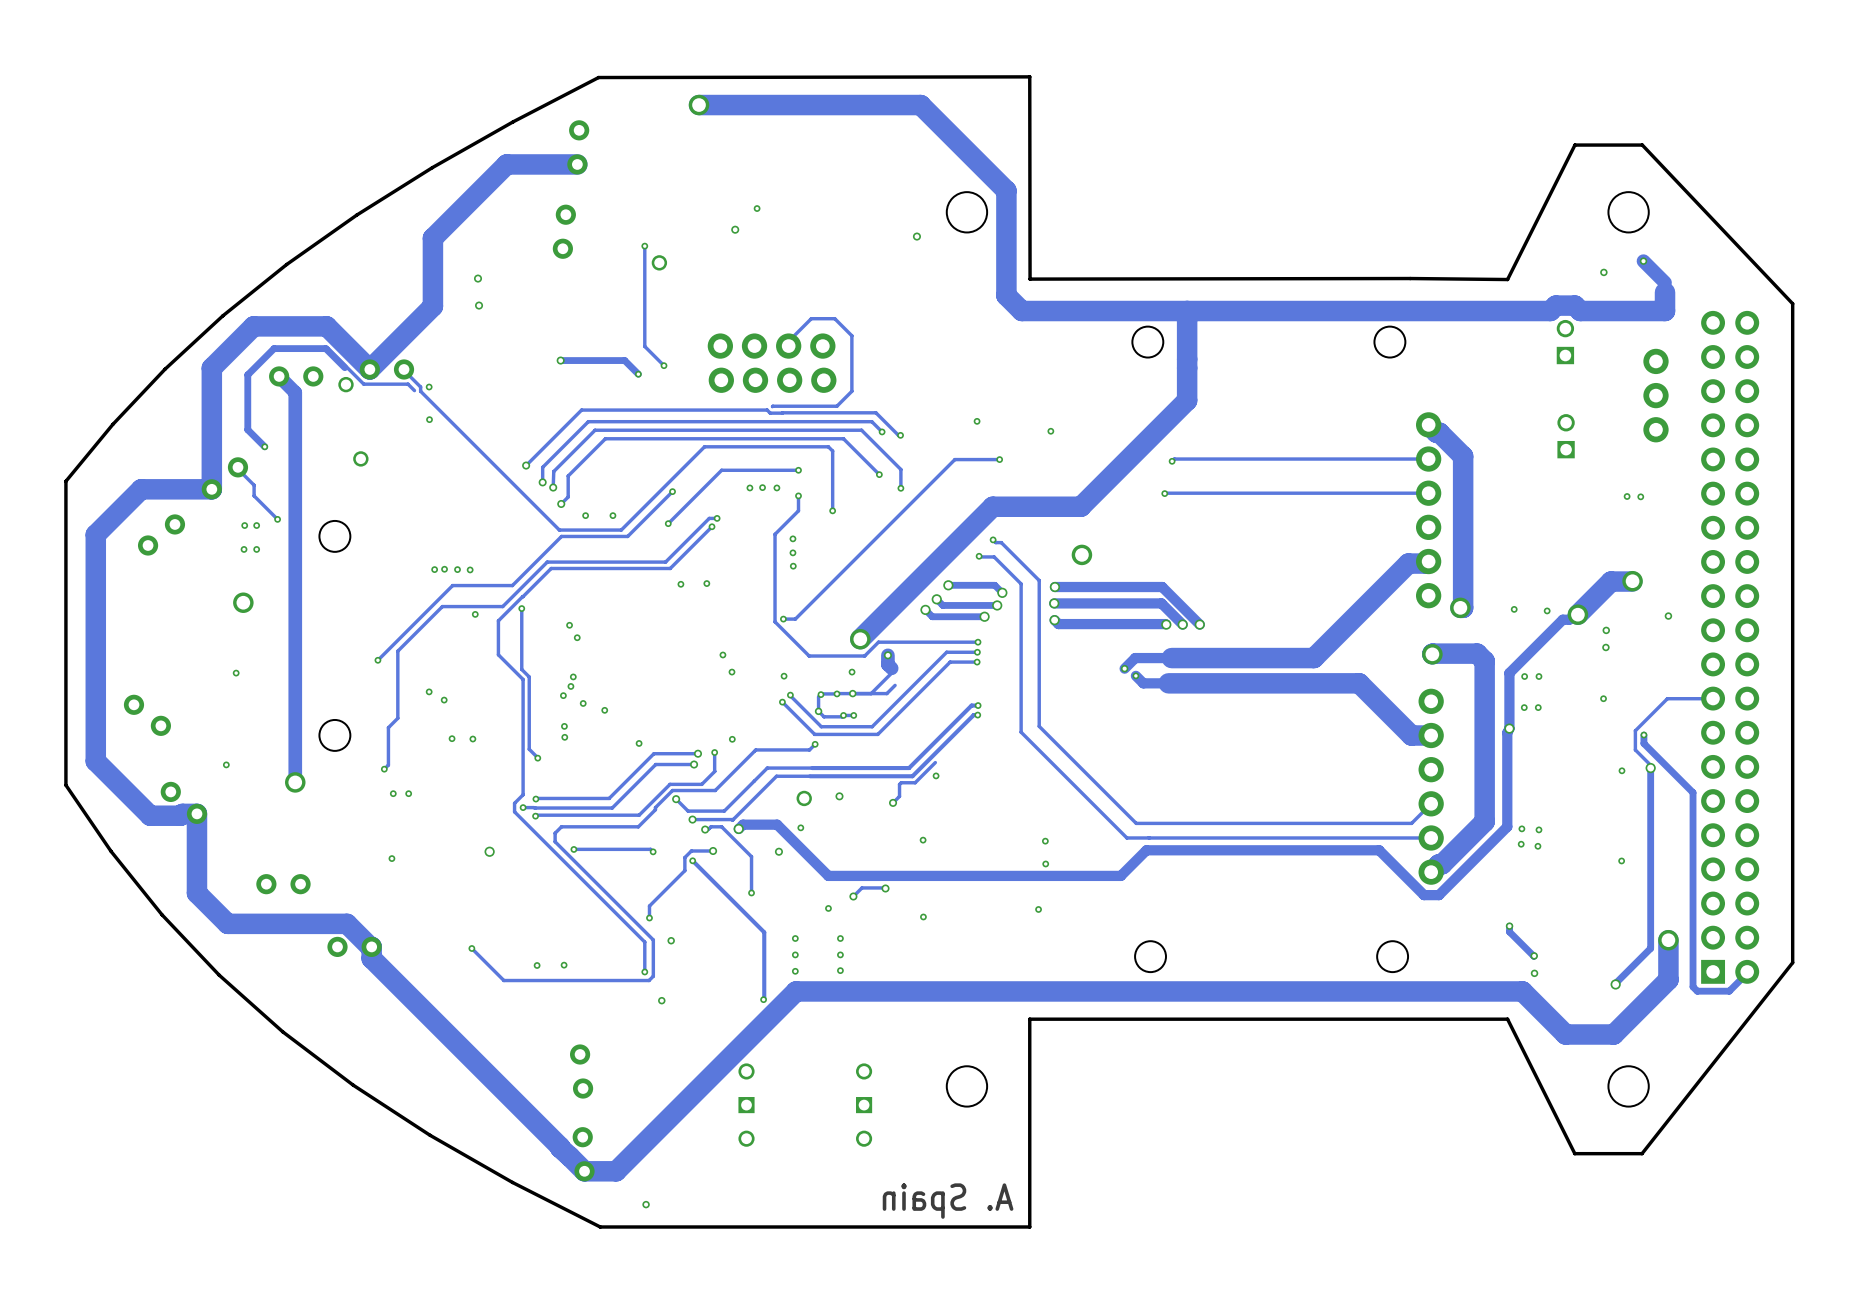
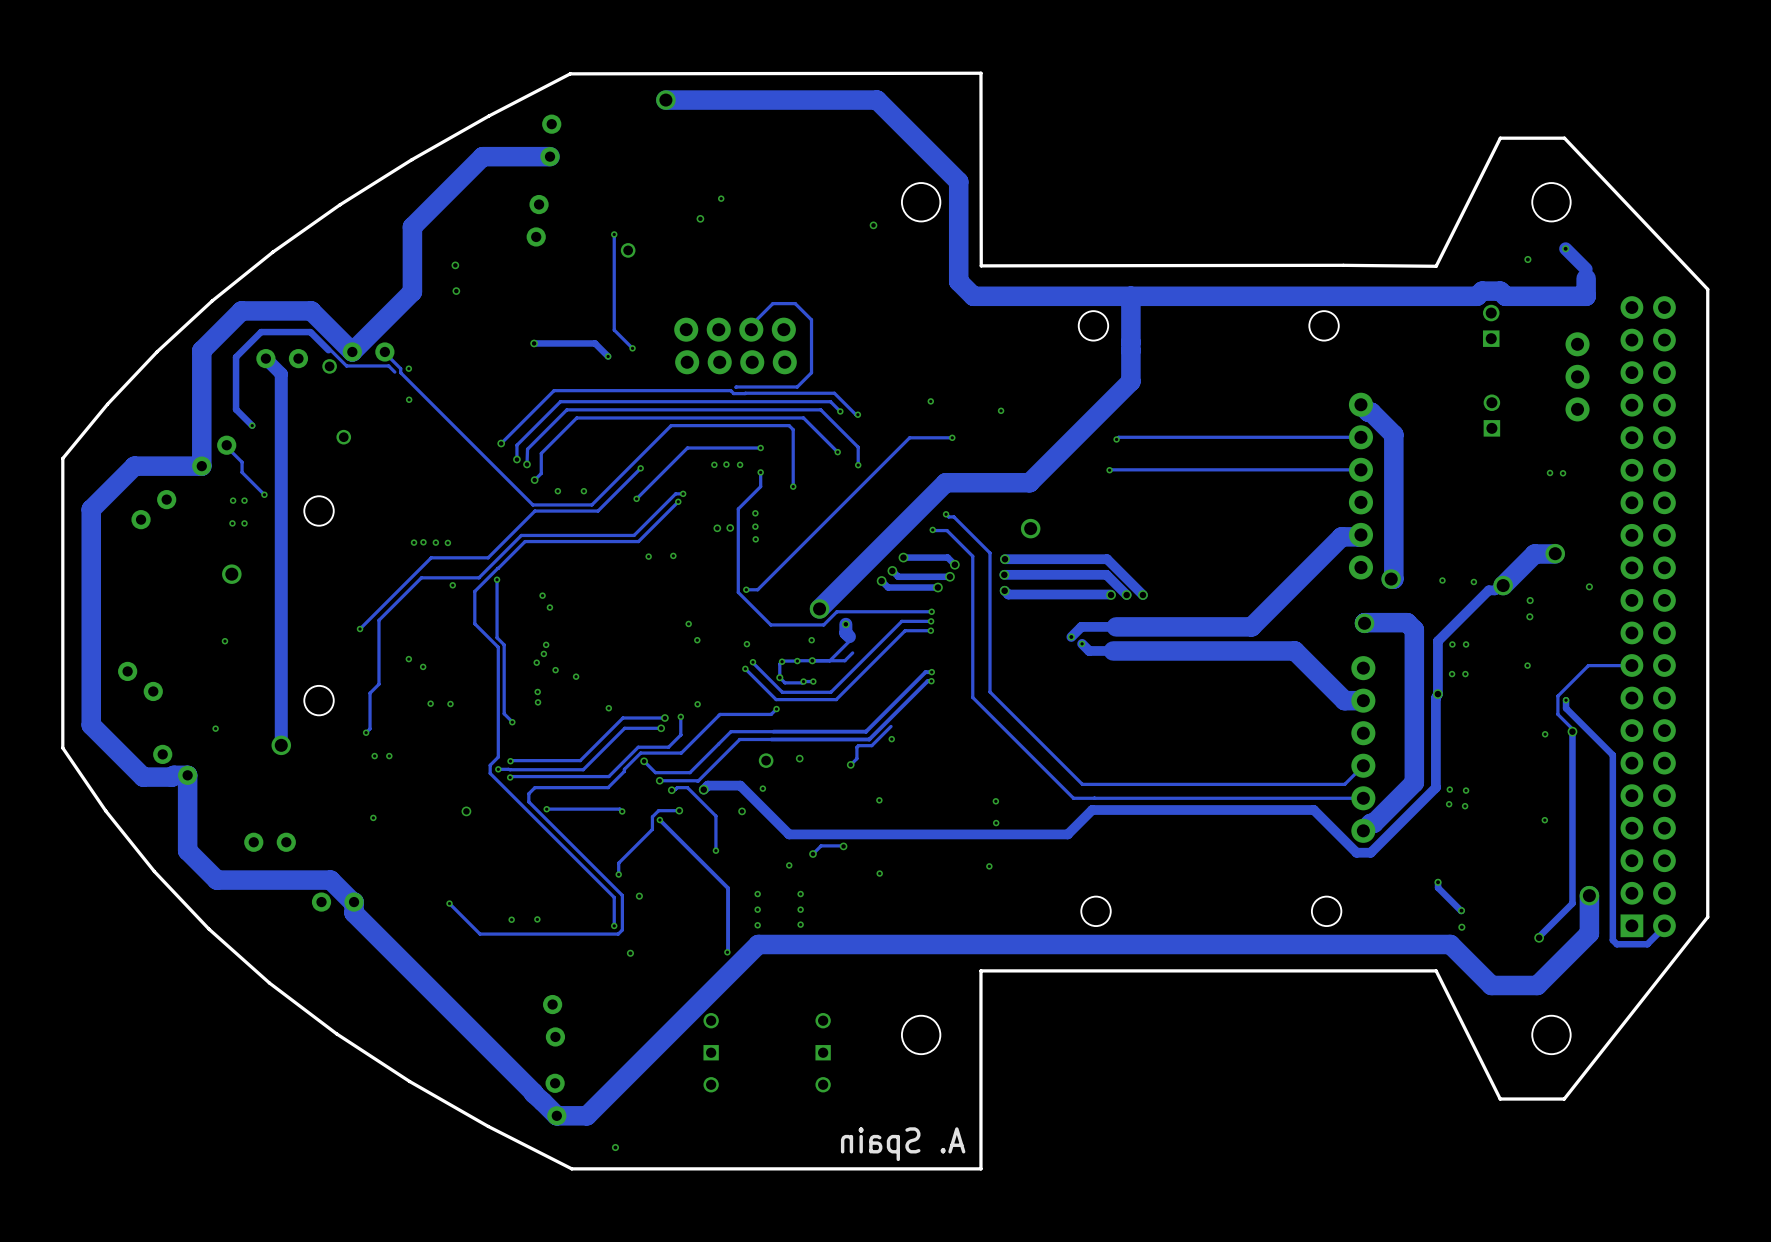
via: none -> (717, 528)
via: none -> (730, 527)

